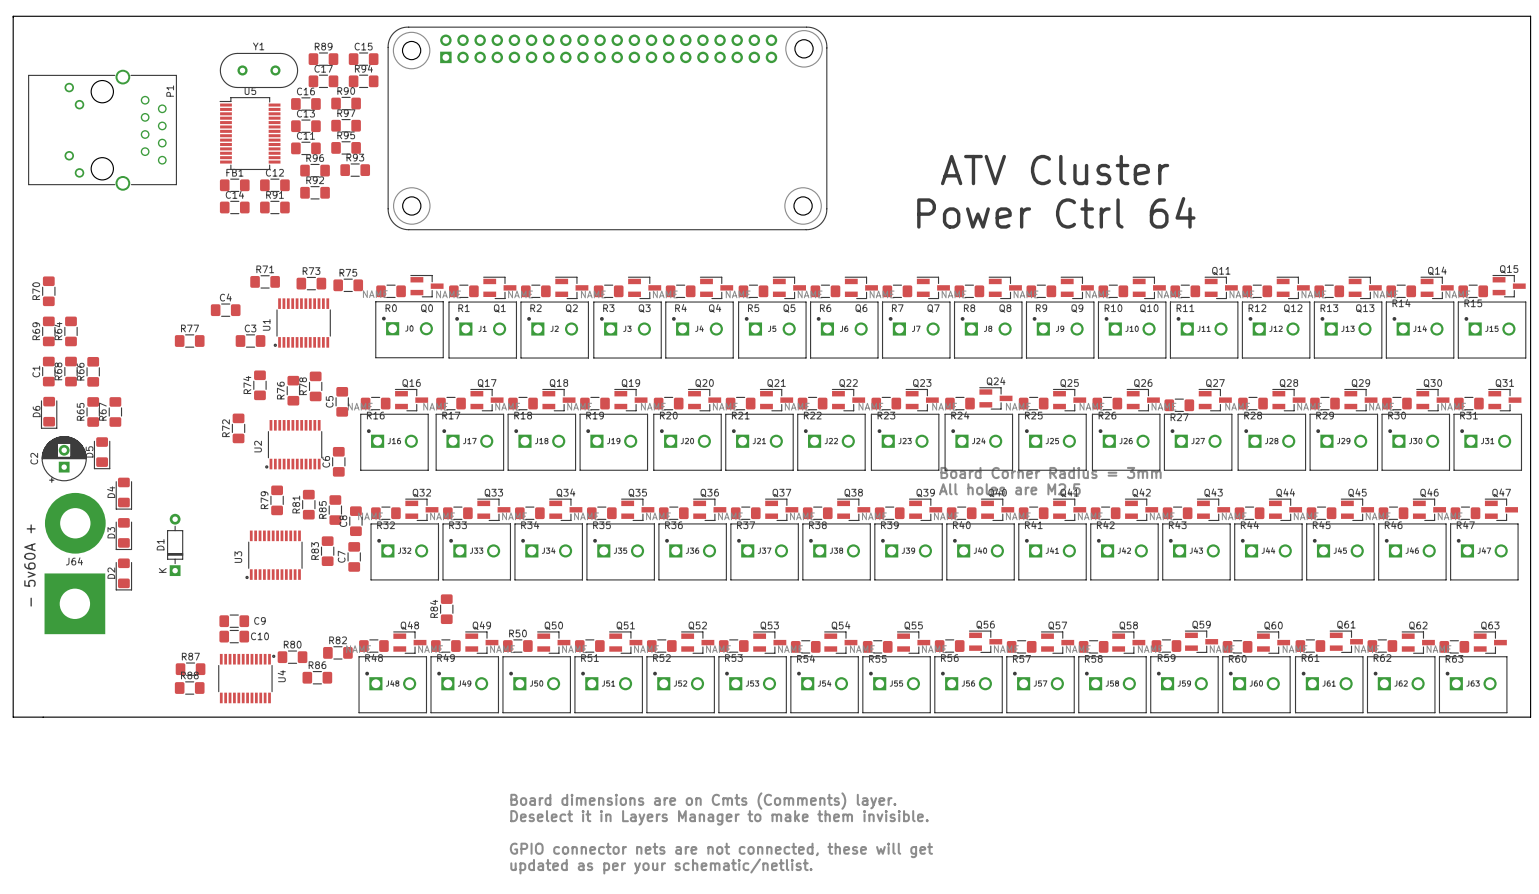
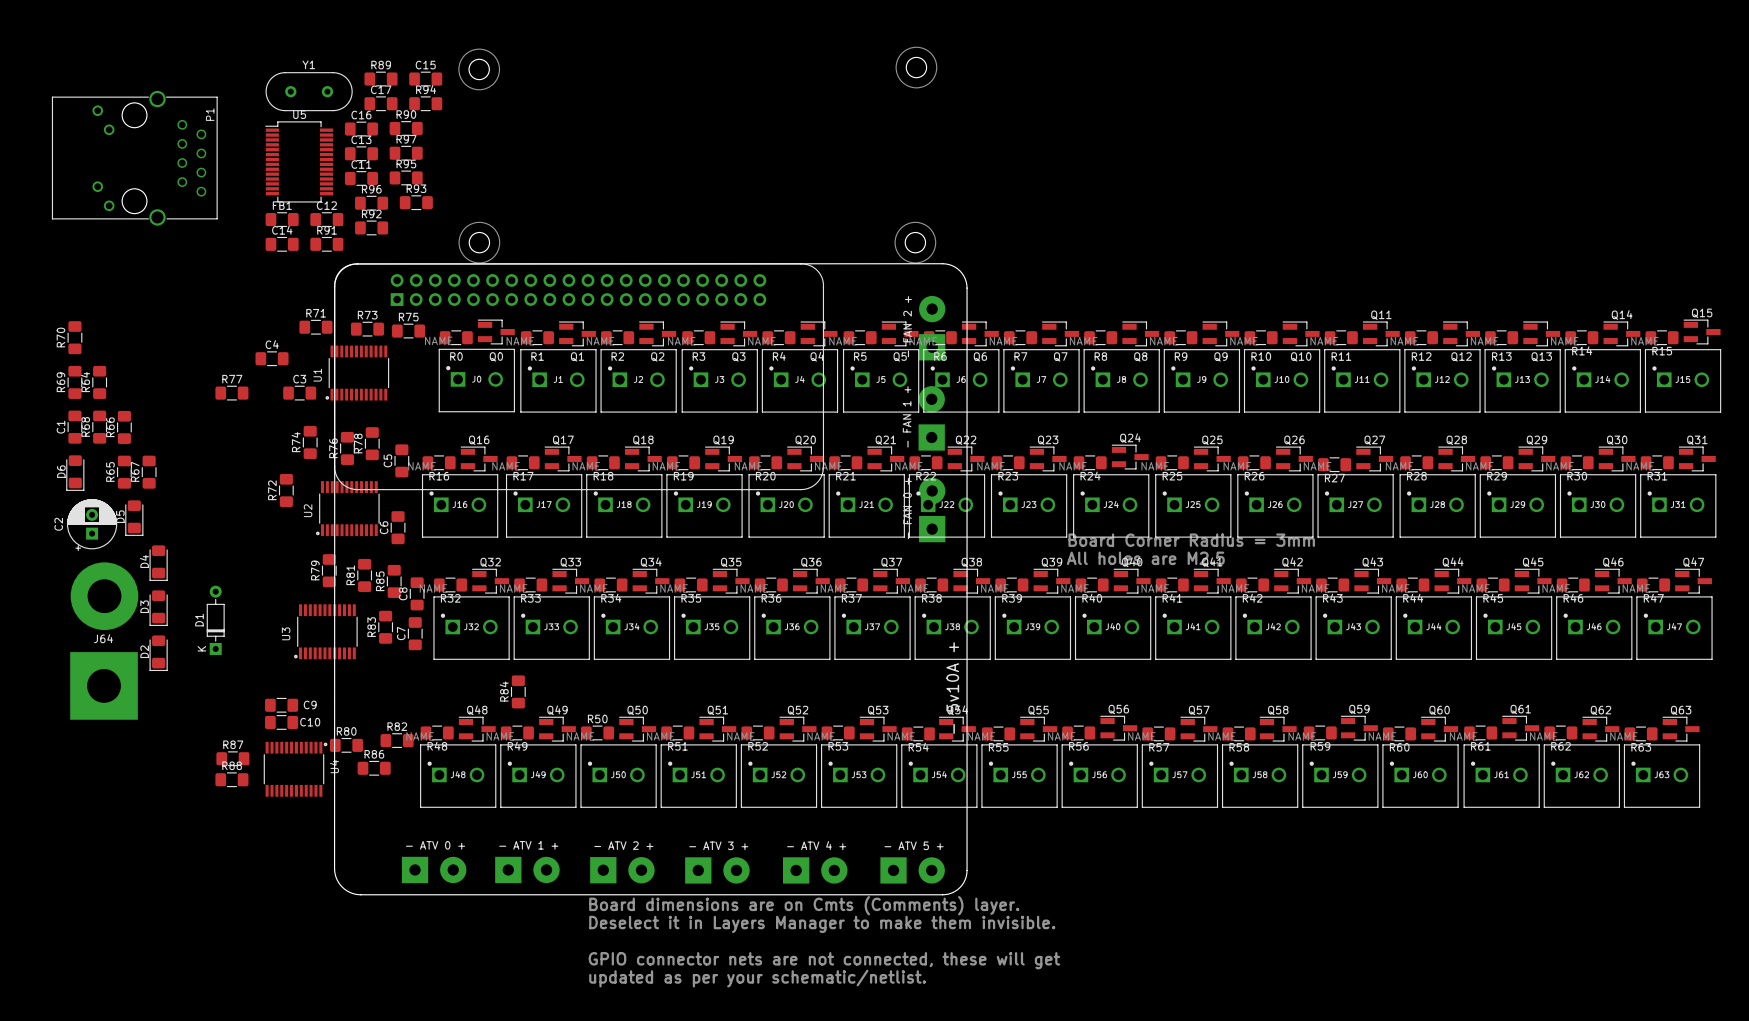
board edge: (13, 16) (13, 717) (1530, 717) (1530, 16) (13, 16) -> none
line: (826, 47) (826, 211) (822, 221) (813, 228) (408, 229) (397, 226) (389, 215) (388, 45) (391, 36) (399, 28) (408, 27) (808, 27) (821, 33) (826, 41) (826, 43) (826, 45) (826, 48) -> none
part: (608, 48) -> none
text: ATV Cluster (1055, 170) -> none
text: Power Ctrl 64 (1056, 212) -> none
board edge: none -> (942, 263) (357, 263) (348, 265) (341, 270) (336, 277) (334, 286) (334, 868) (337, 879) (342, 887) (352, 893) (360, 894) (942, 894) (952, 892) (959, 887) (965, 879) (967, 870) (967, 288) (965, 278) (959, 270) (952, 265) (942, 263)
line: none -> (823, 286) (823, 466)
line: none -> (823, 287) (822, 279) (817, 270) (808, 265) (800, 263) (354, 263) (347, 265) (339, 272) (334, 286) (334, 468) (339, 480) (349, 488) (803, 489) (816, 482) (822, 474) (823, 466)
part: none -> (578, 289)
part: none -> (932, 328)
part: none -> (931, 418)
part: none -> (932, 510)
text: - 5v60A + (29, 565) -> none
text: none -> - 5v10A + (952, 688)
part: none -> (434, 869)
part: none -> (527, 869)
part: none -> (622, 870)
part: none -> (717, 870)
part: none -> (815, 870)
part: none -> (912, 870)

